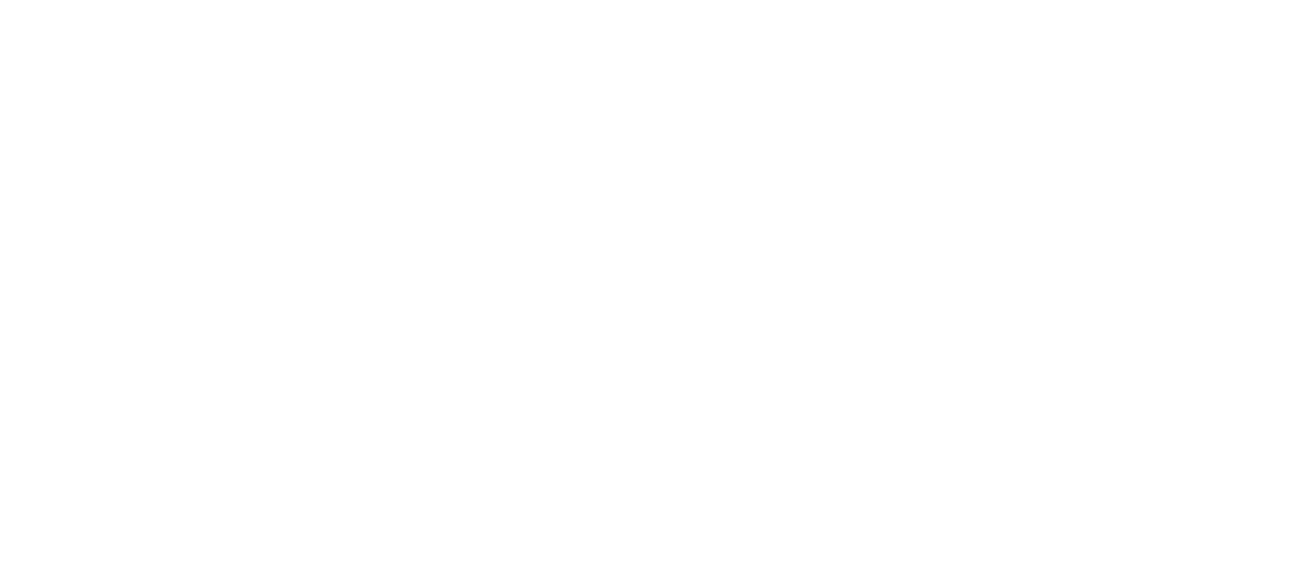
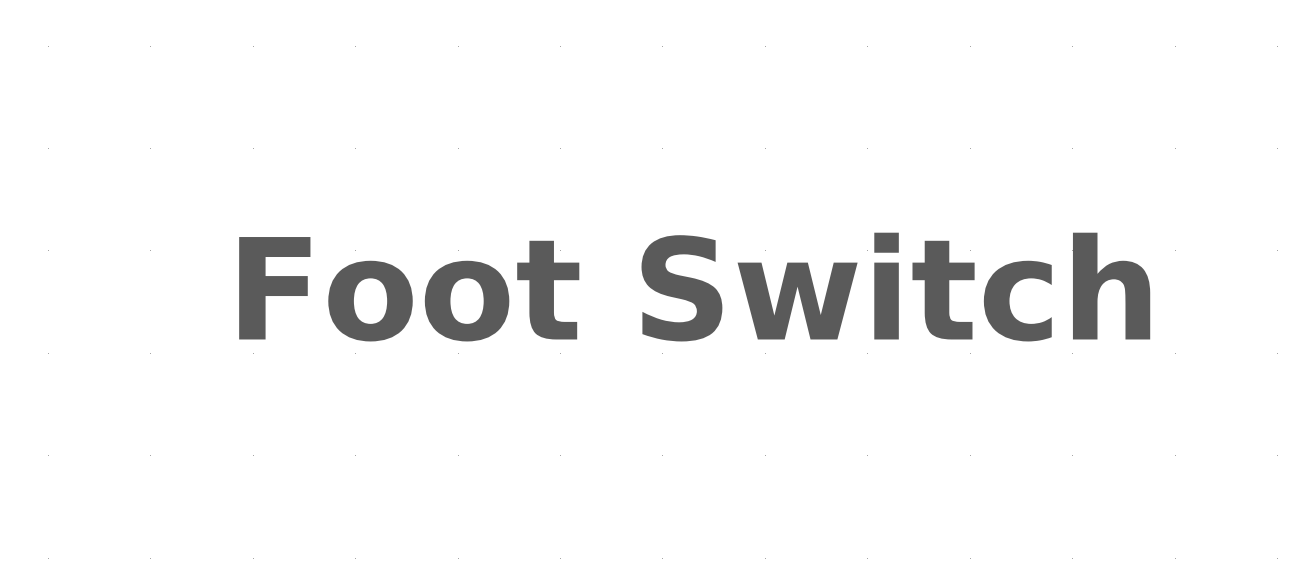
text: none -> Foot Switch (694, 287)

